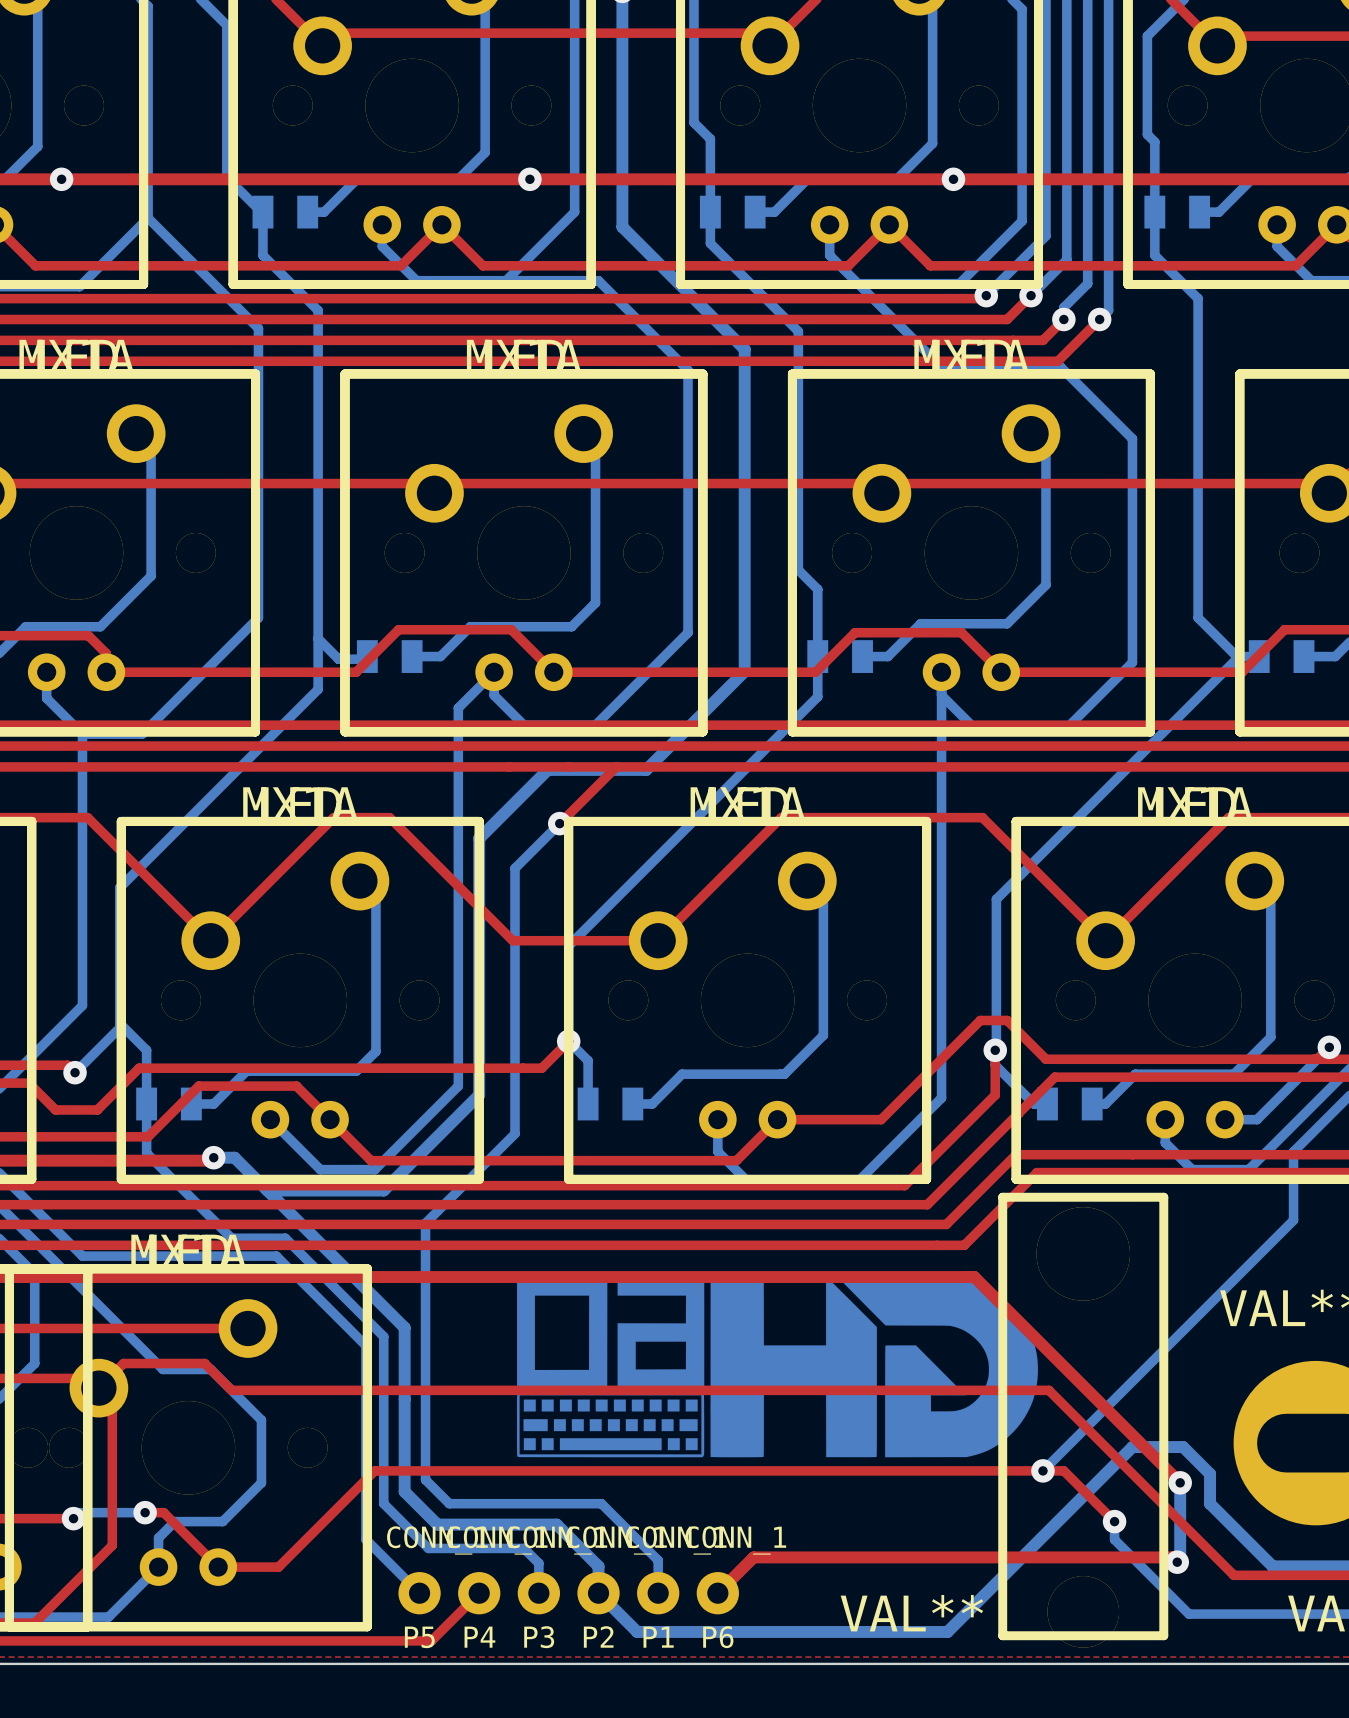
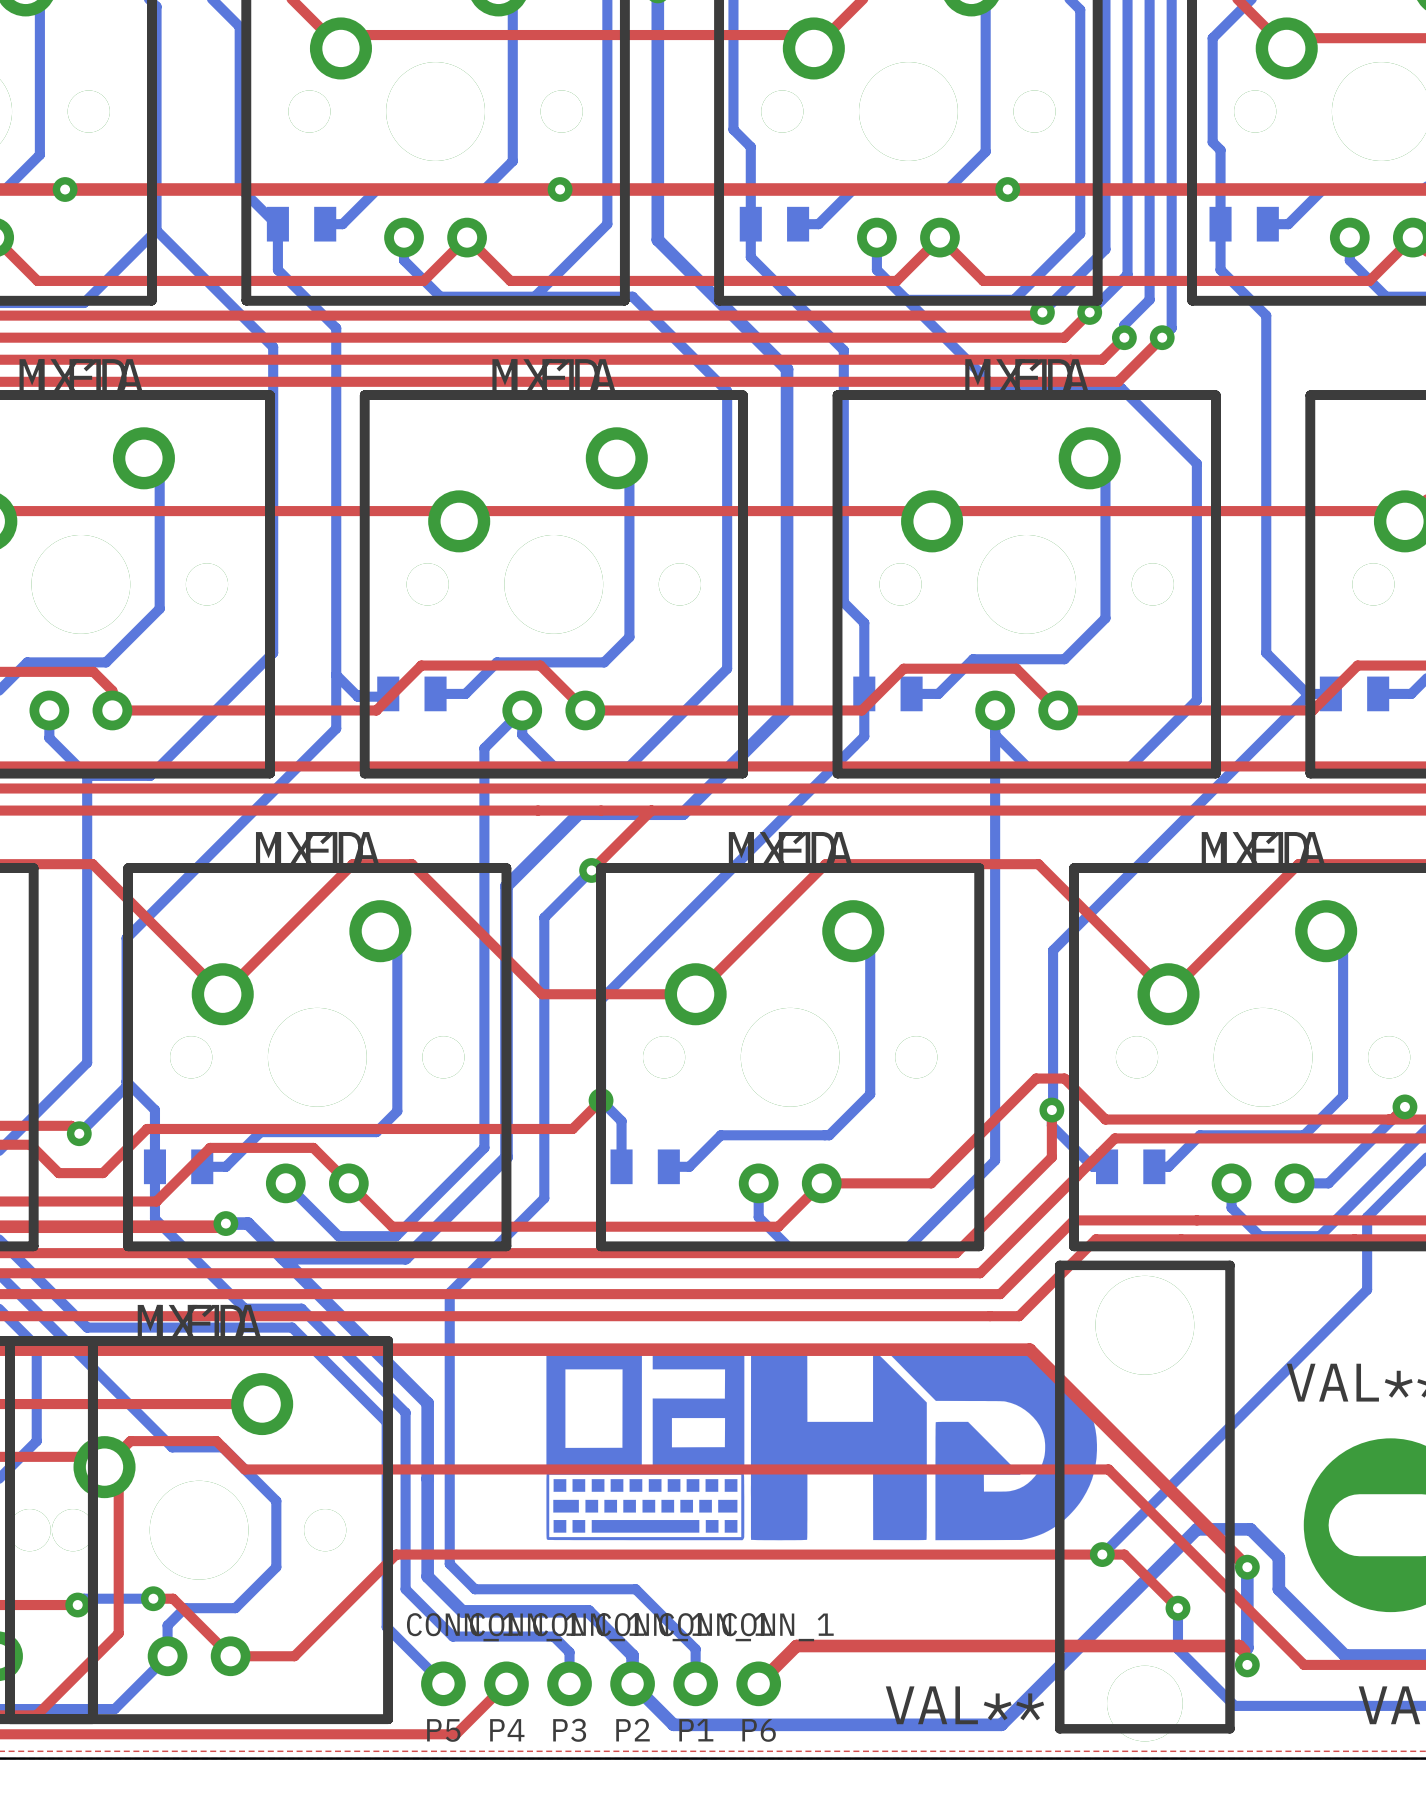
bottom track: (1114, 1539) (1188, 1614) -> (1177, 1627) (1177, 1649) (1234, 1705) (1256, 1705)
via position: (1177, 1562) -> (1247, 1664)

